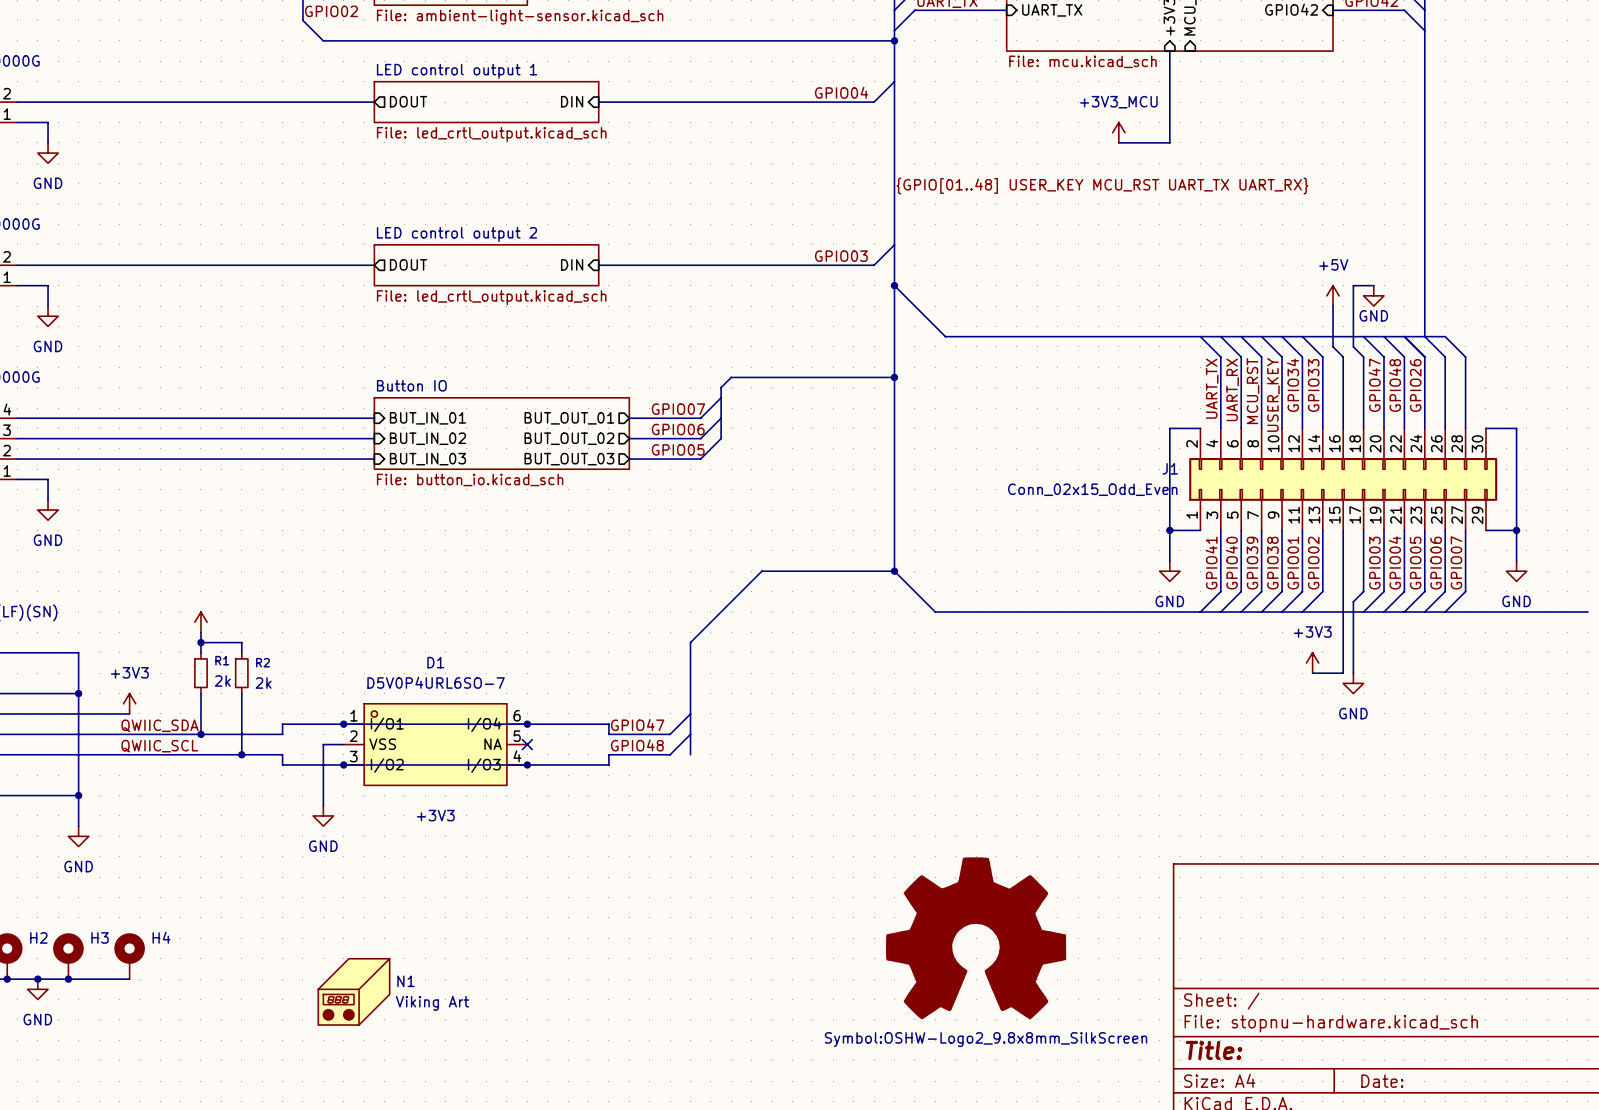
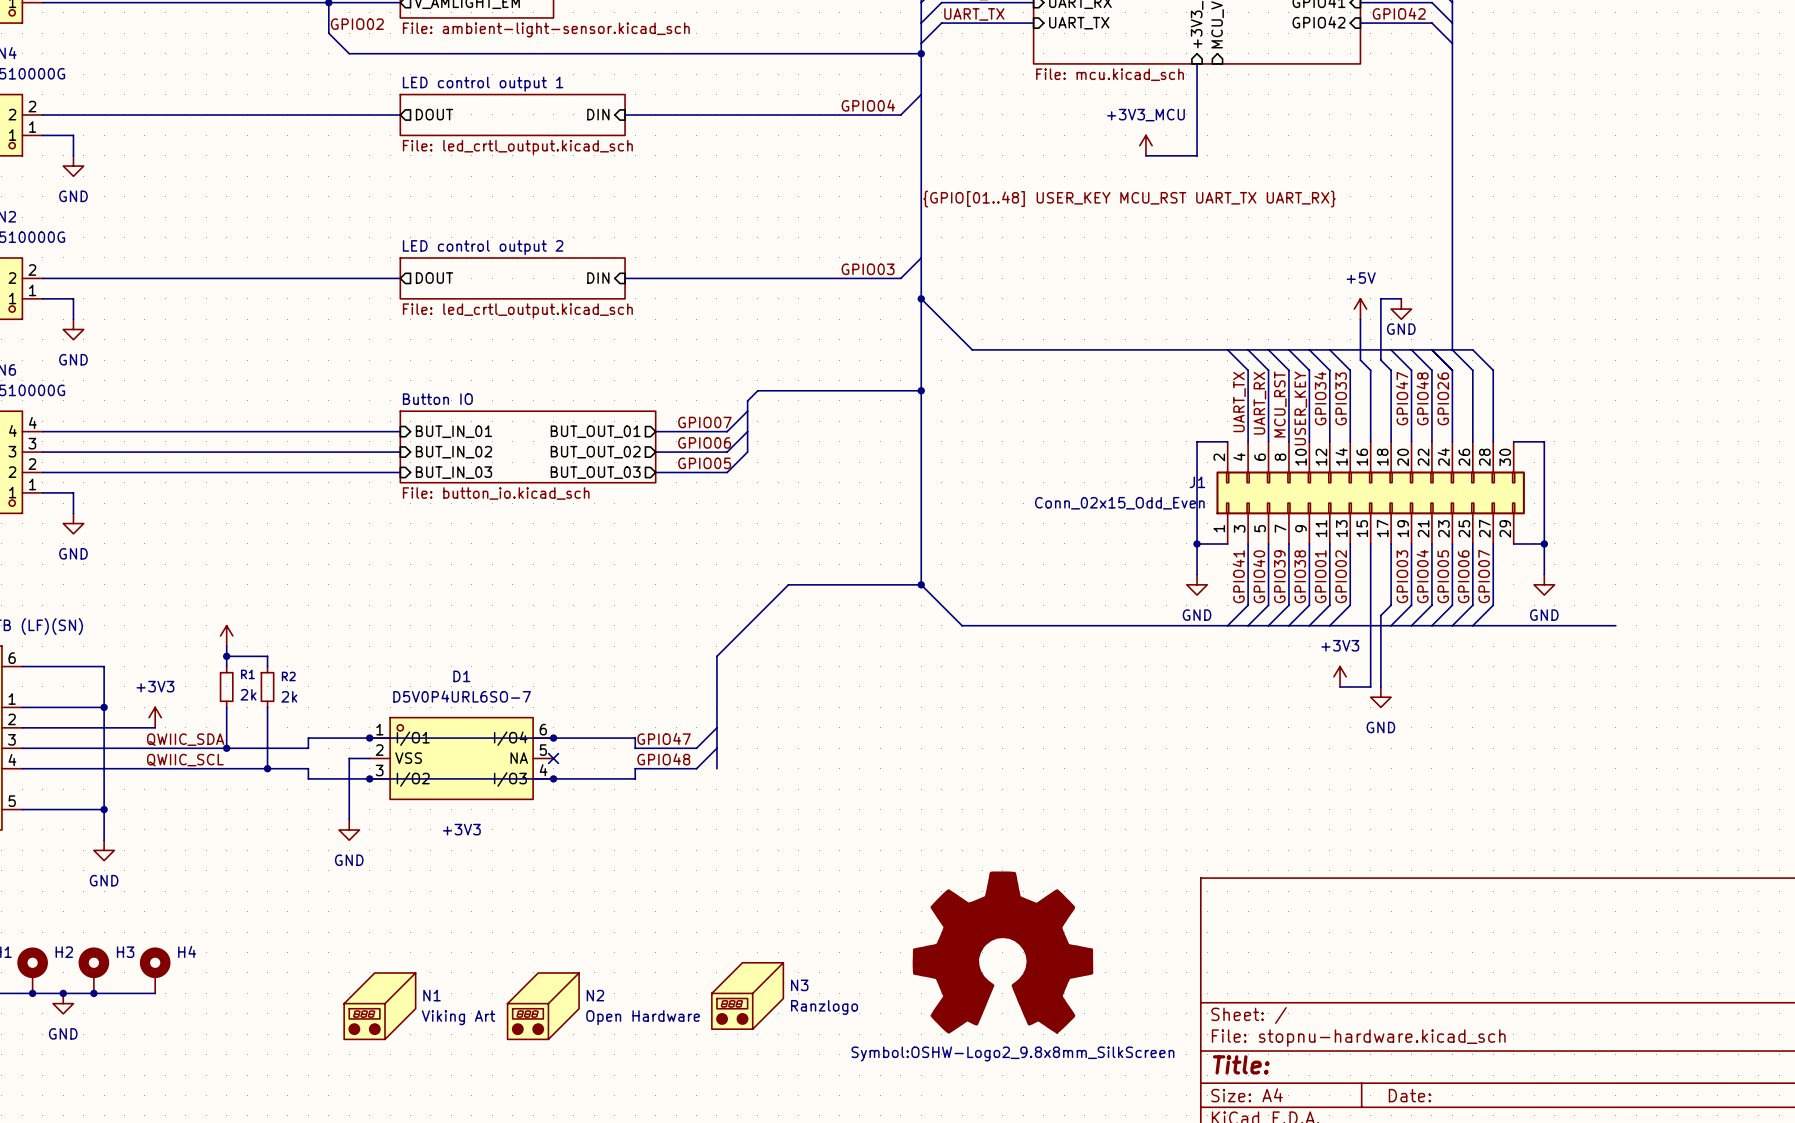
N3: none -> Ranzlogo (747, 995)
N2: none -> Open Hardware (543, 1006)

